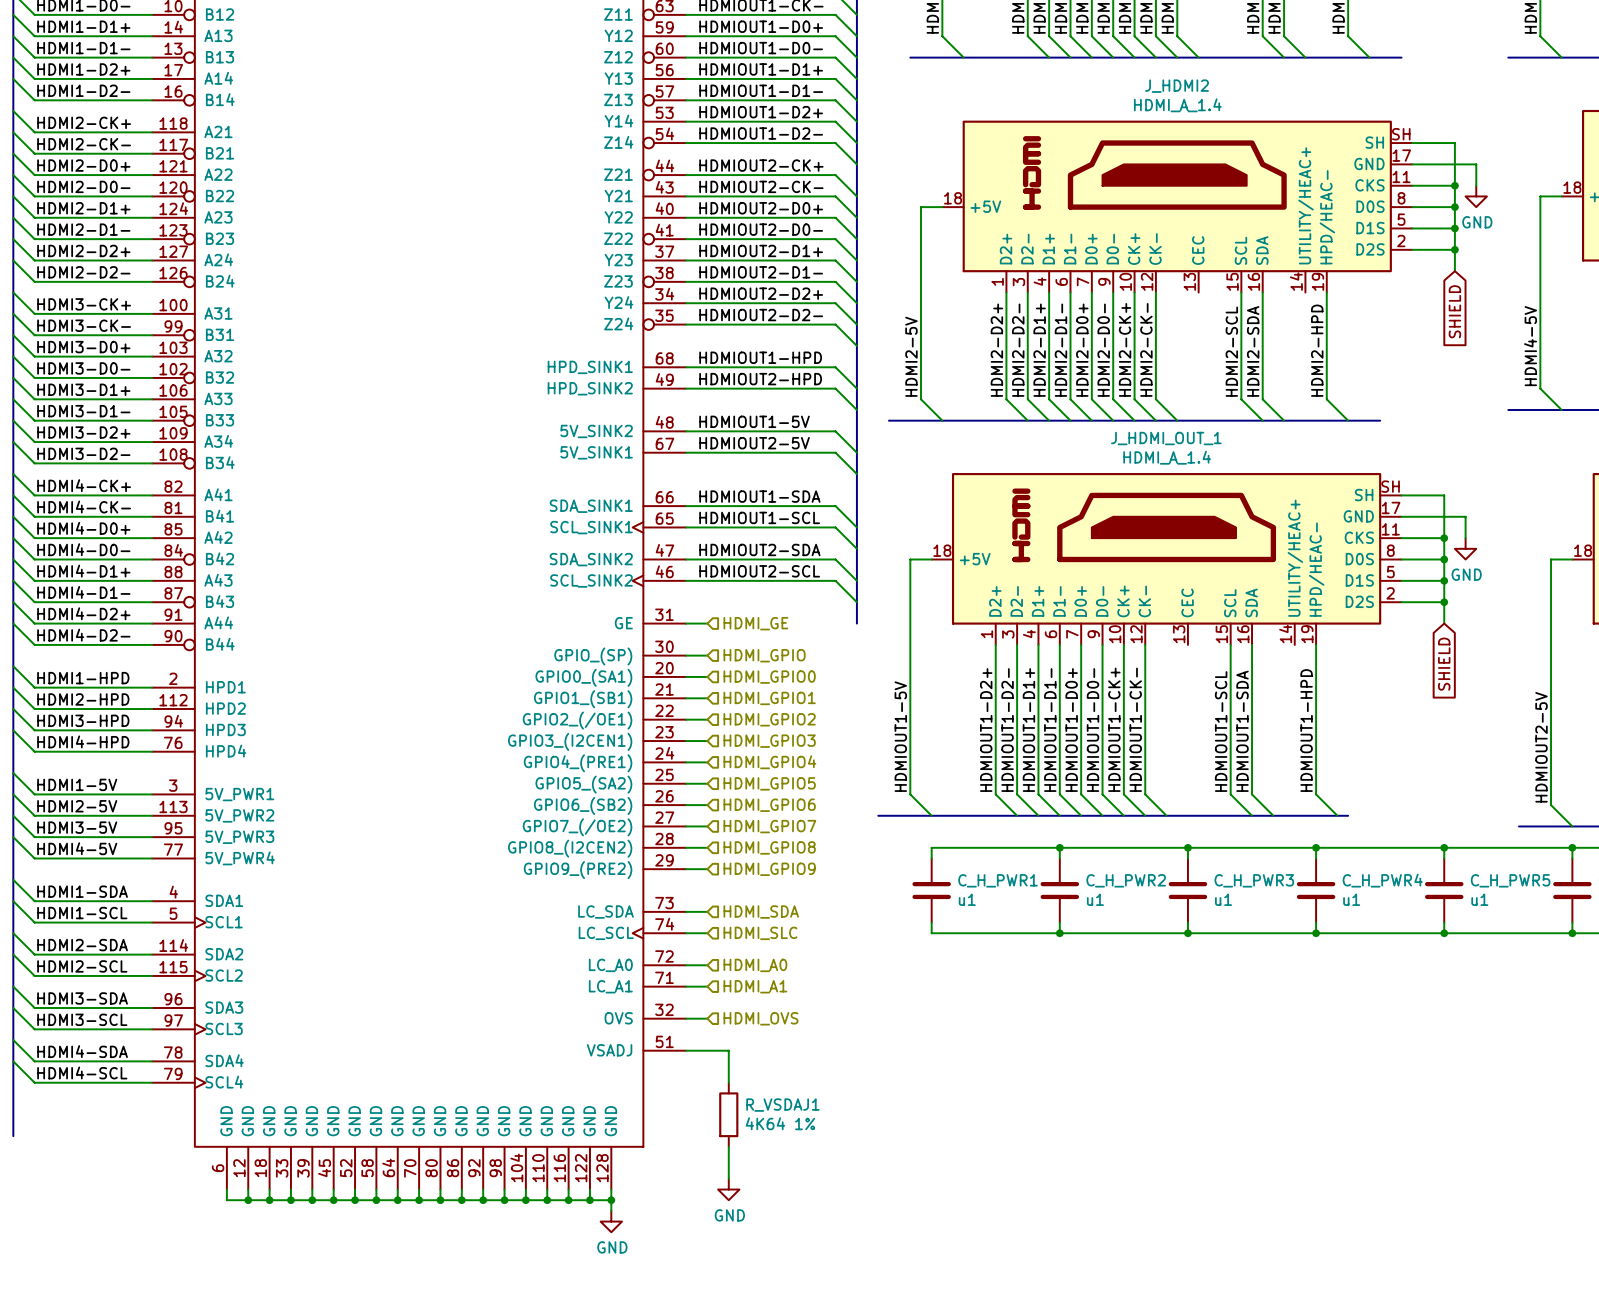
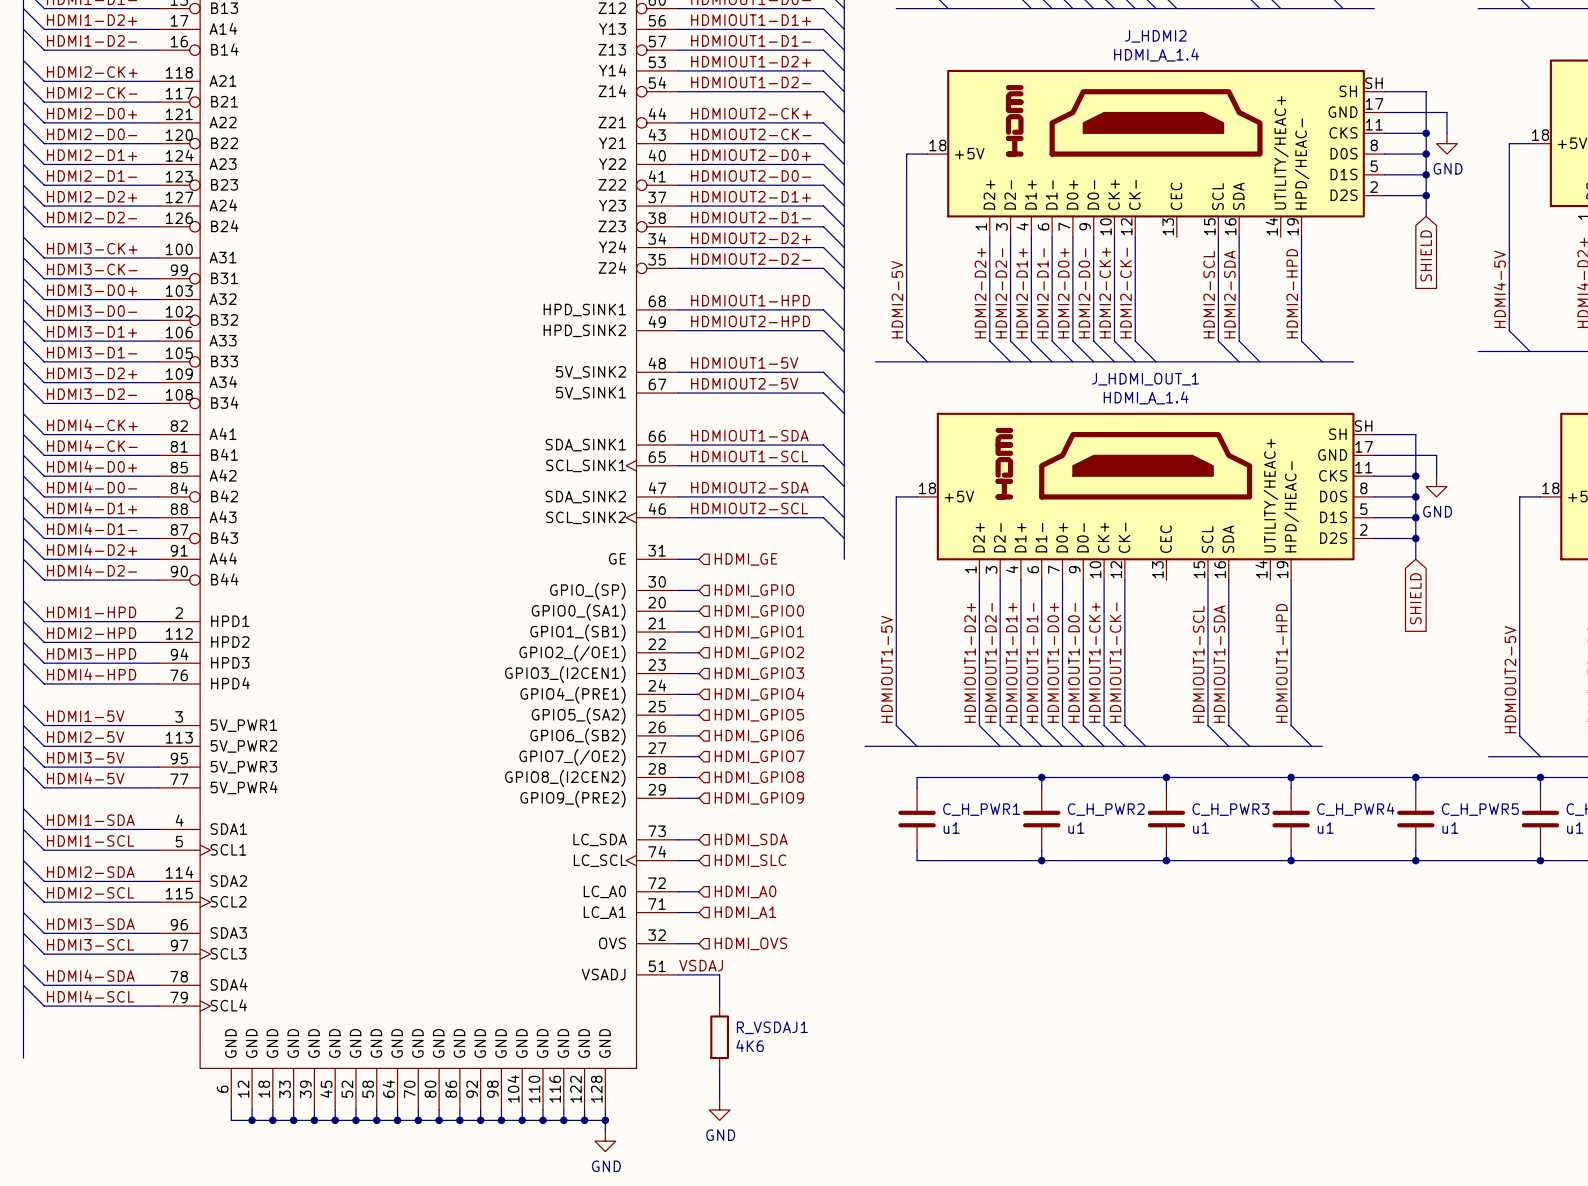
label: none -> VSDAJ (701, 965)
R_VSDAJ1 value: 4K64 1% (780, 1123) -> 4K6 (750, 1045)

